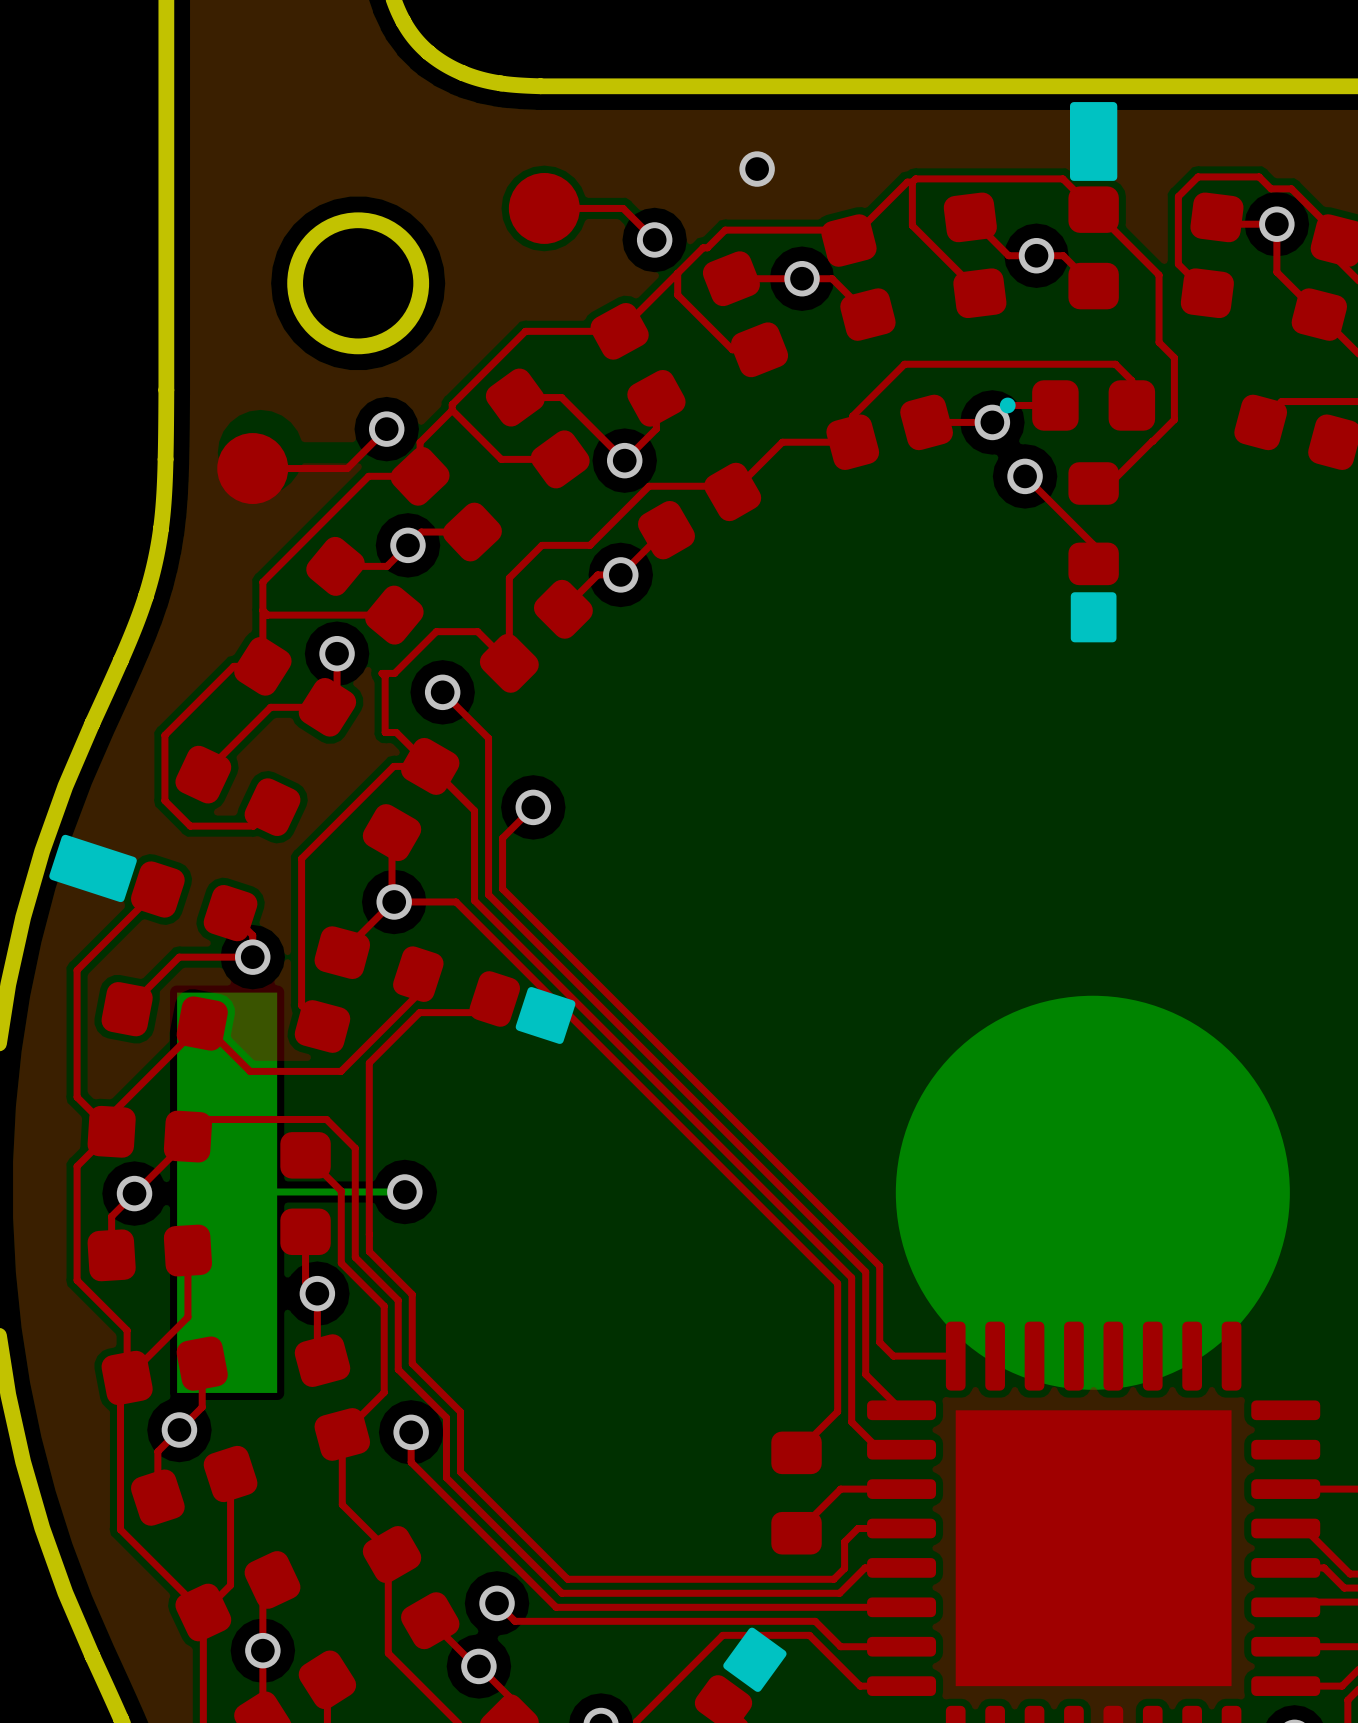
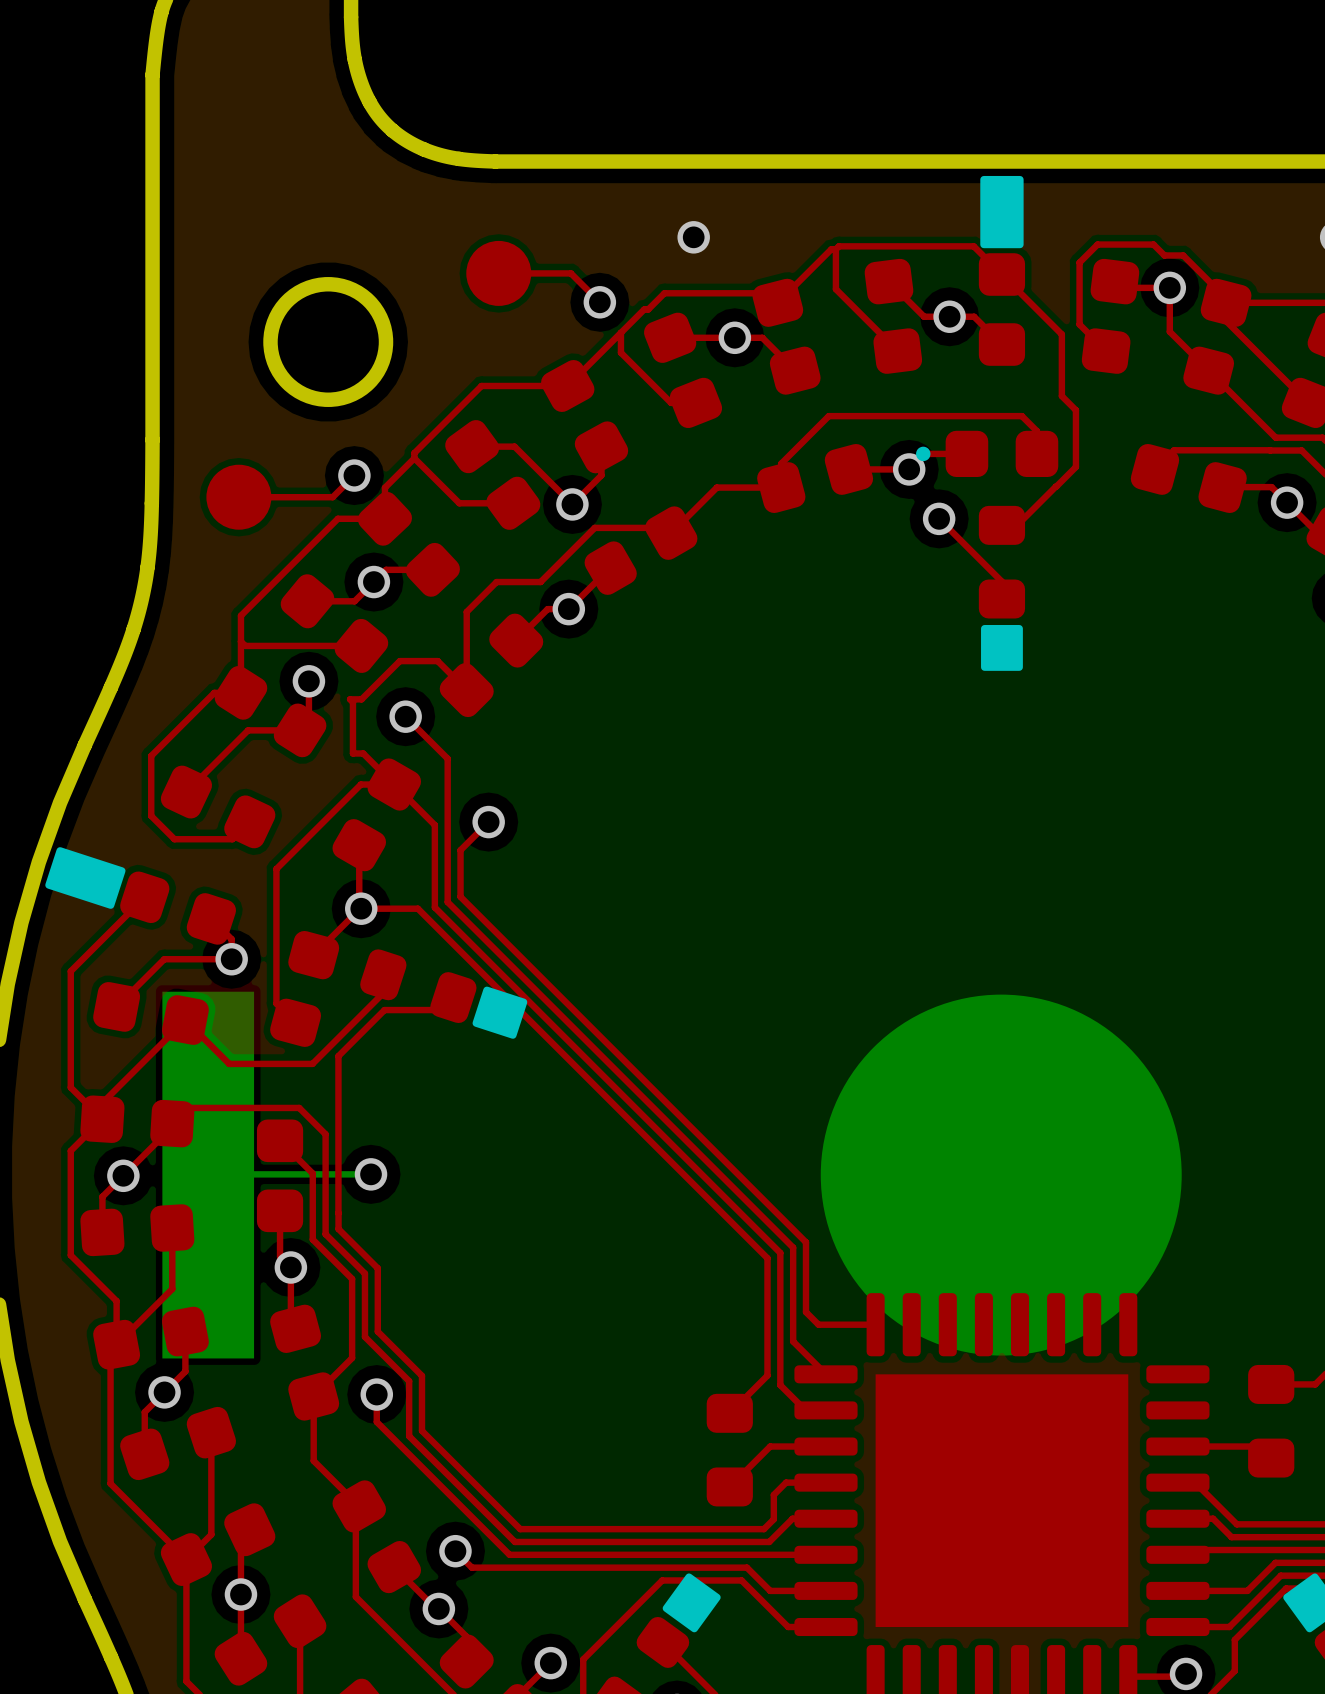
top track: (363, 452) (347, 468) (252, 468) -> (332, 497) (238, 497)
part position: (252, 468) -> (238, 497)

